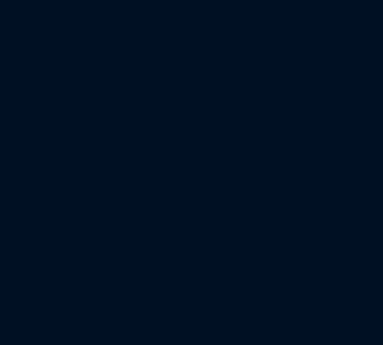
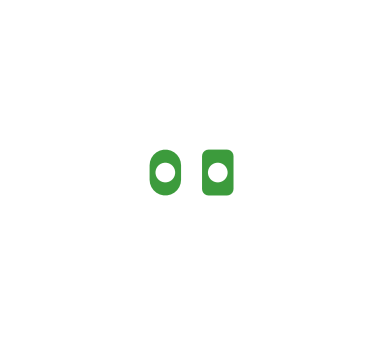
part: none -> (191, 172)

